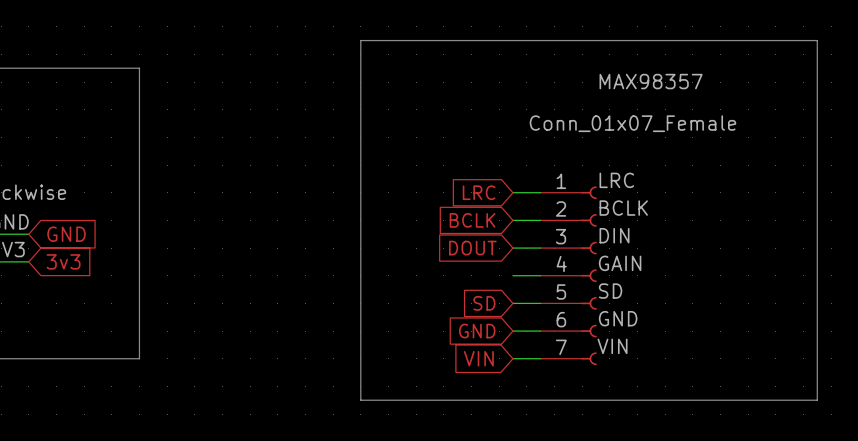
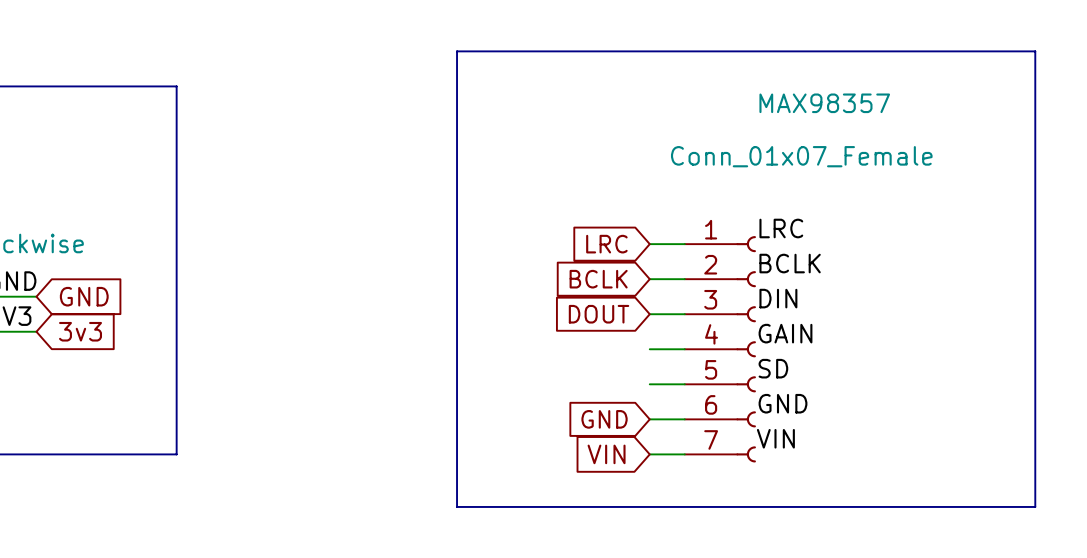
global label: SD (484, 303) -> none

